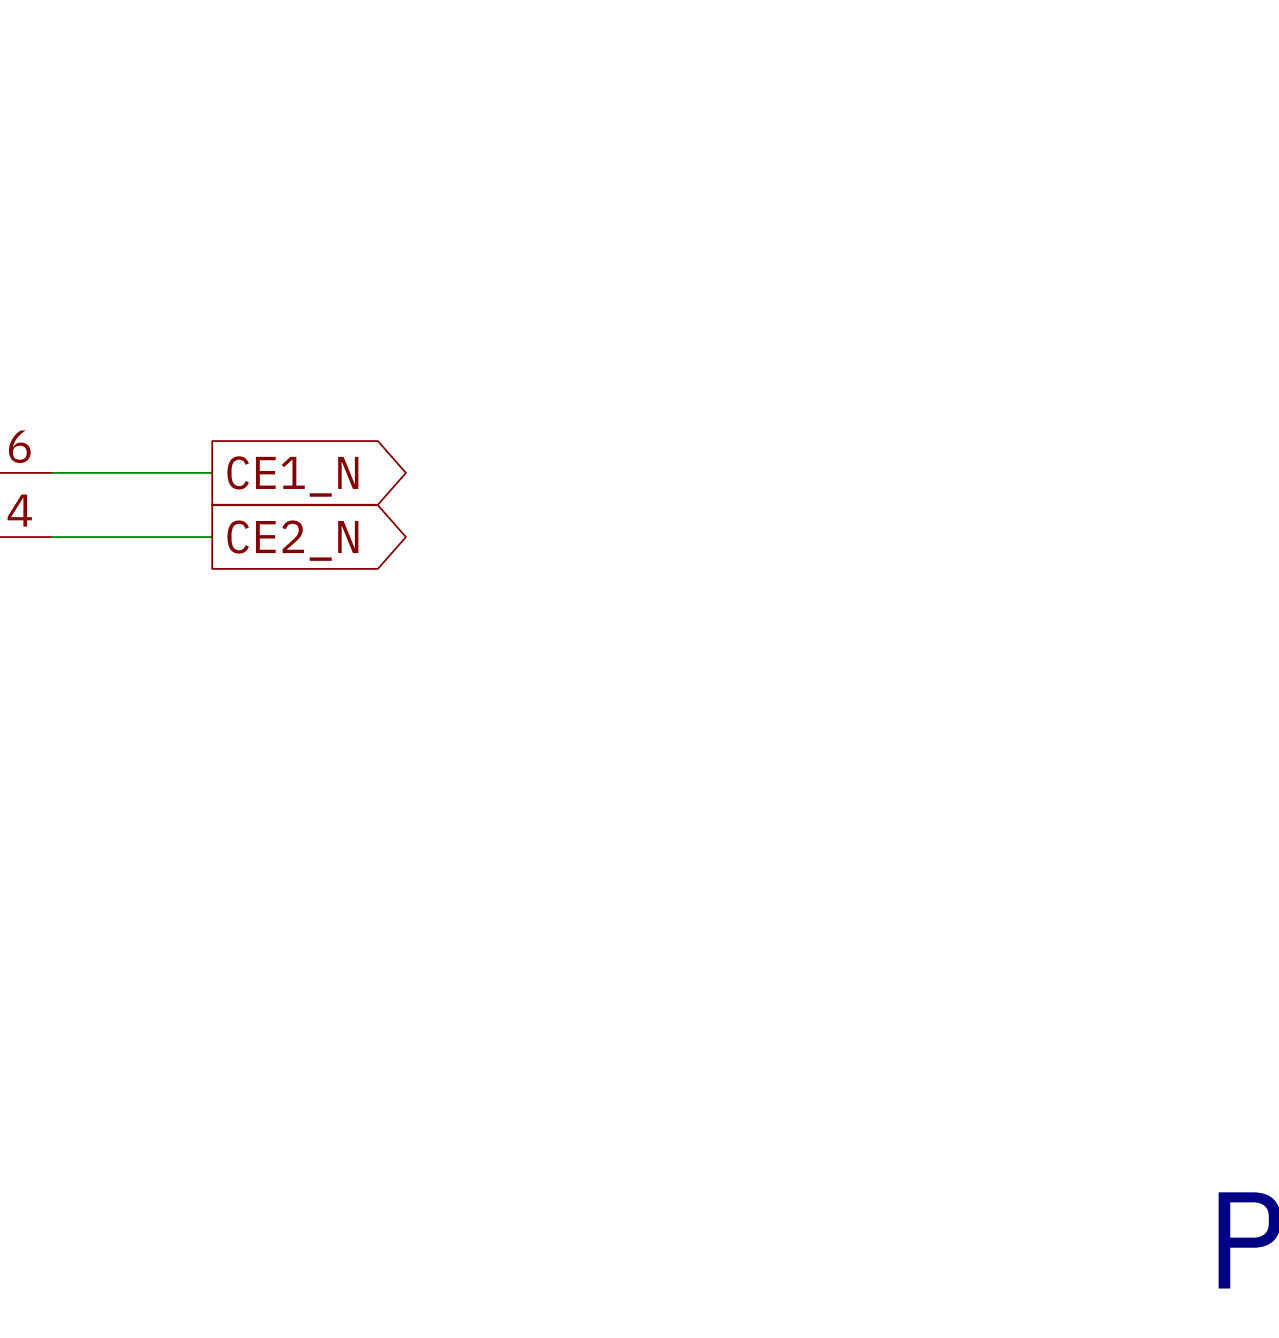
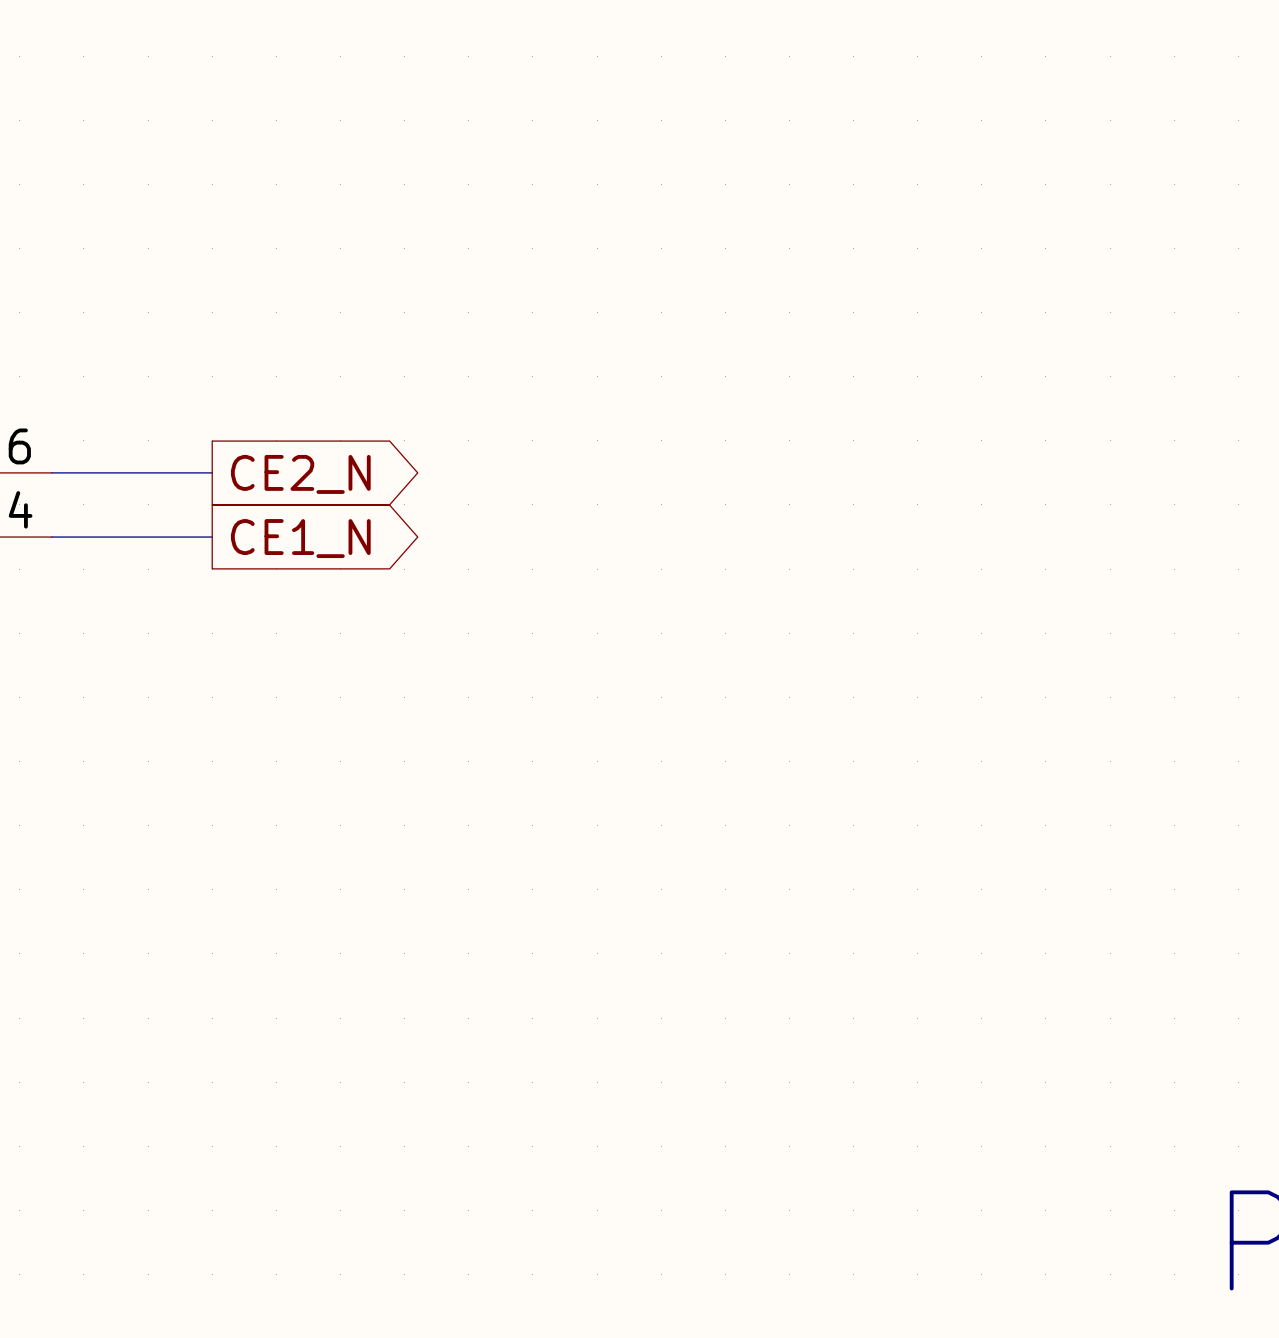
global label: CE1_N (292, 476) -> CE2_N (300, 474)
global label: CE2_N (292, 540) -> CE1_N (300, 538)

